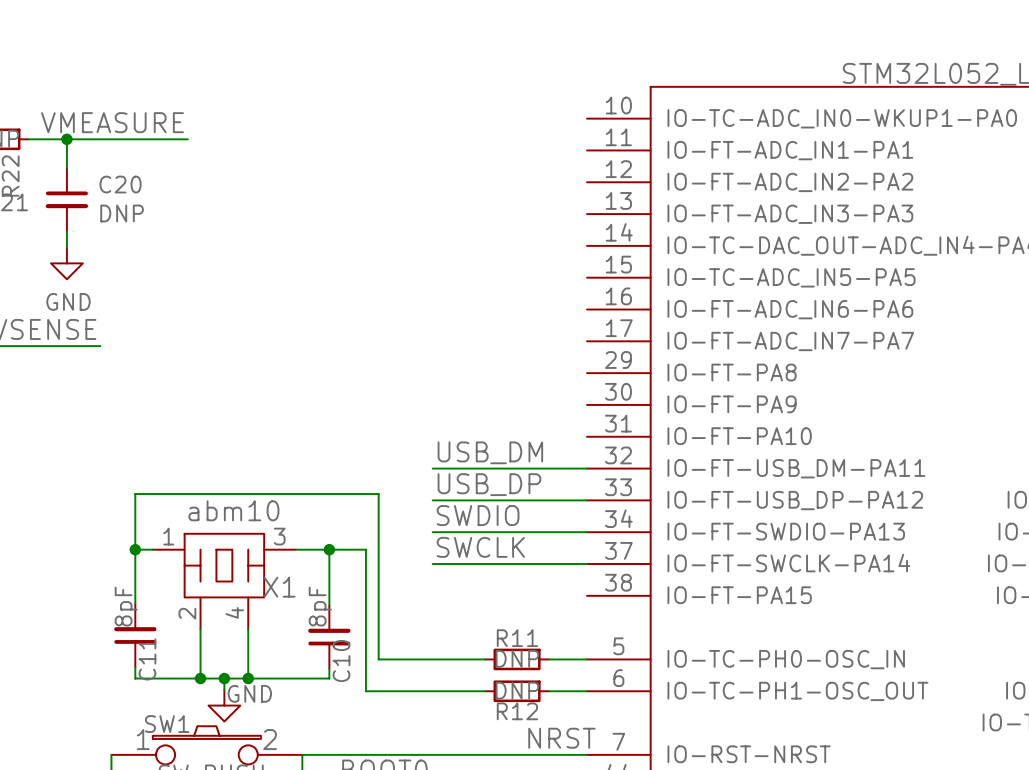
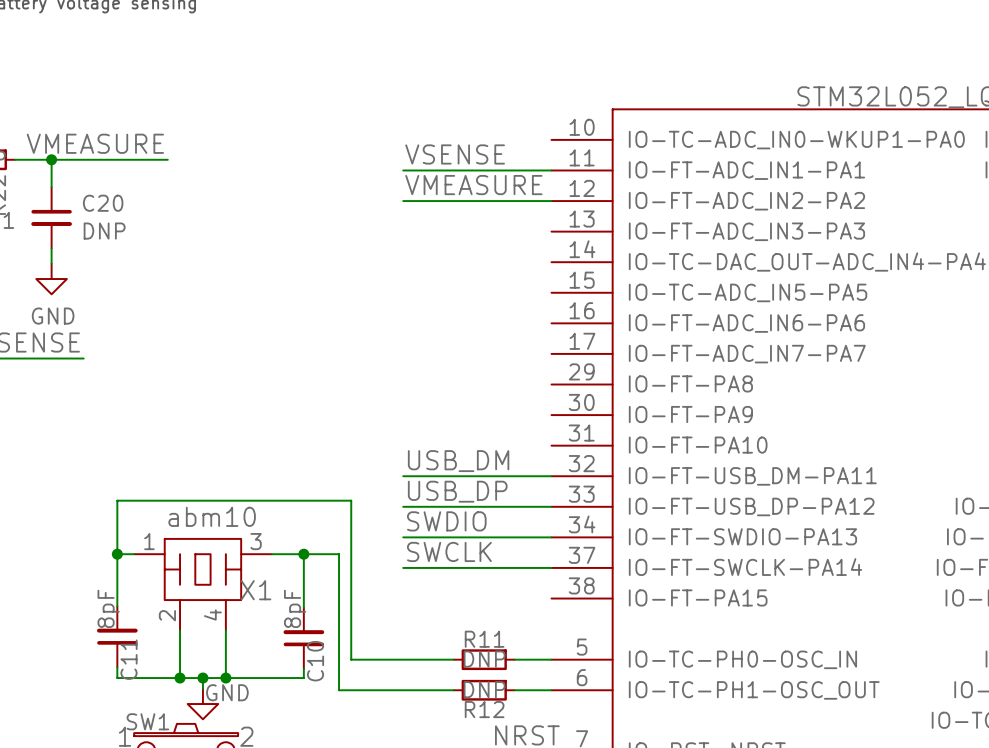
label: none -> VSENSE (455, 154)
wire: none -> (403, 170) (551, 170)
label: none -> VMEASURE (473, 185)
wire: none -> (403, 201) (551, 201)

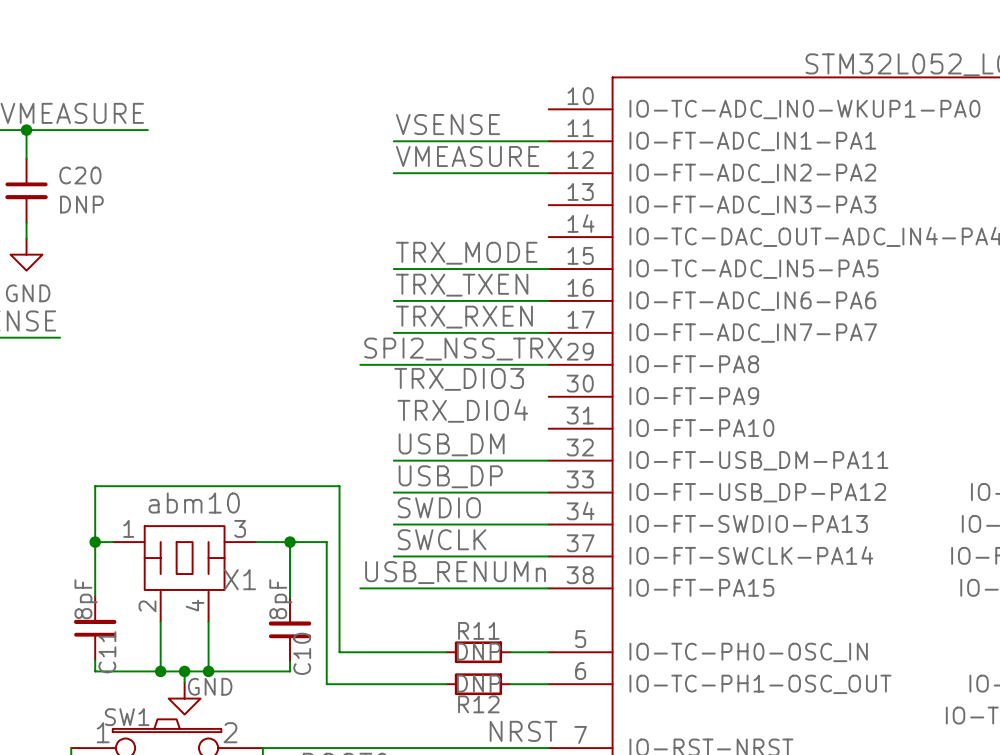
label: none -> TRX_MODE (466, 253)
wire: none -> (393, 269) (548, 269)
label: none -> TRX_TXEN (462, 285)
wire: none -> (393, 300) (548, 300)
label: none -> TRX_RXEN (464, 317)
wire: none -> (393, 332) (548, 332)
label: none -> SPI2_NSS_TRX (463, 349)
wire: none -> (360, 364) (548, 364)
label: none -> TRX_DIO3 (459, 379)
label: none -> TRX_DIO4 (462, 410)
label: none -> USB_RENUMn (455, 572)
wire: none -> (360, 588) (548, 588)

